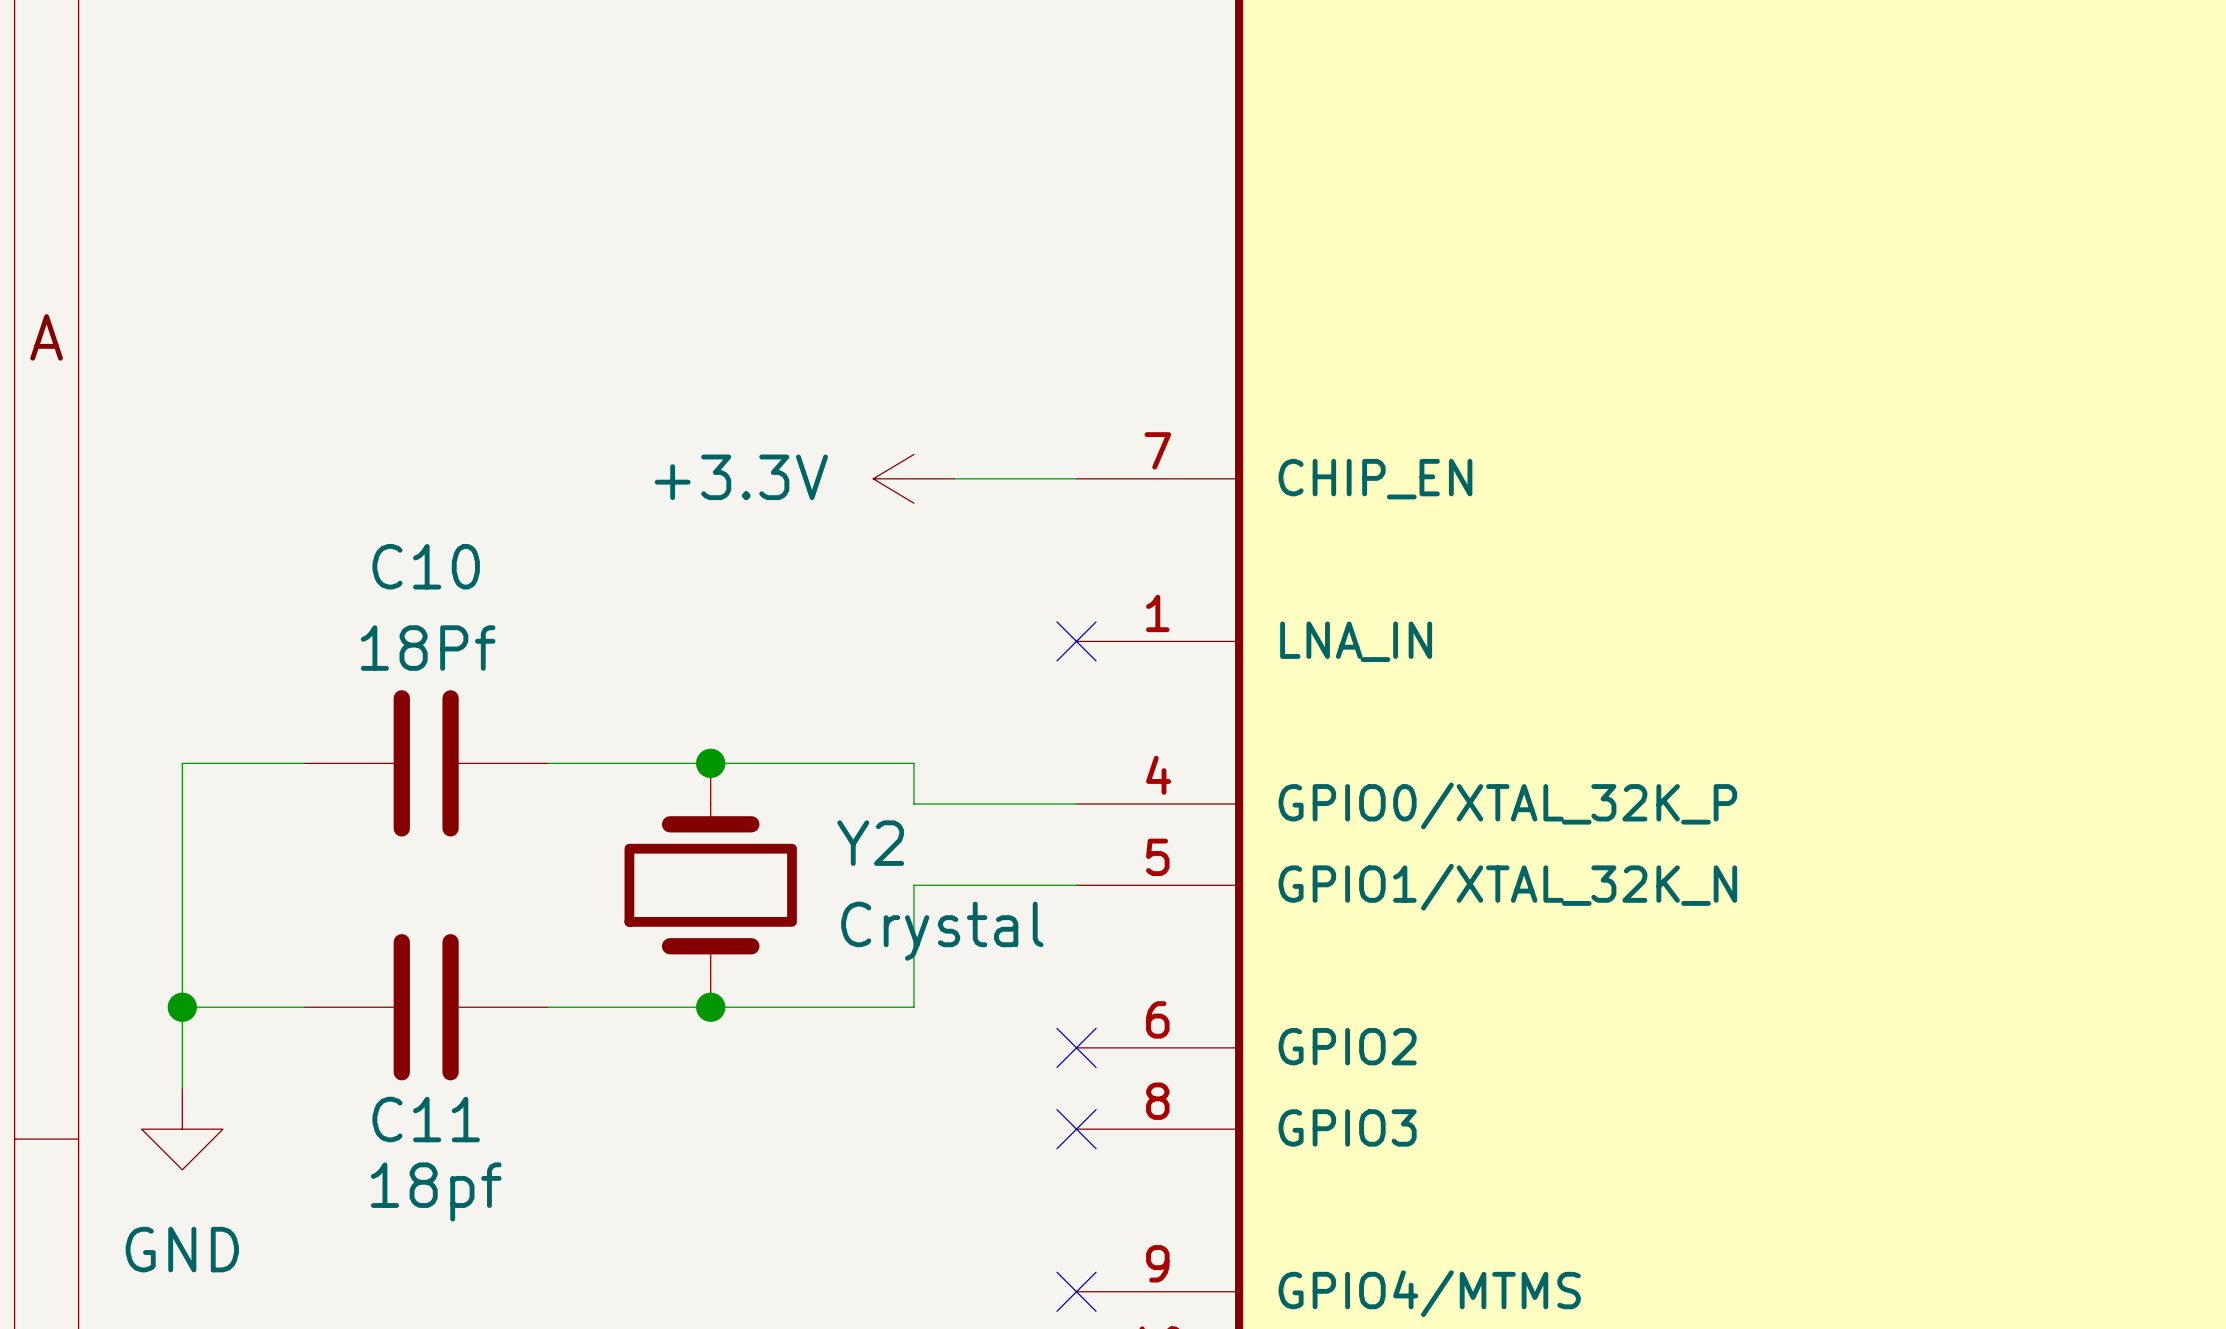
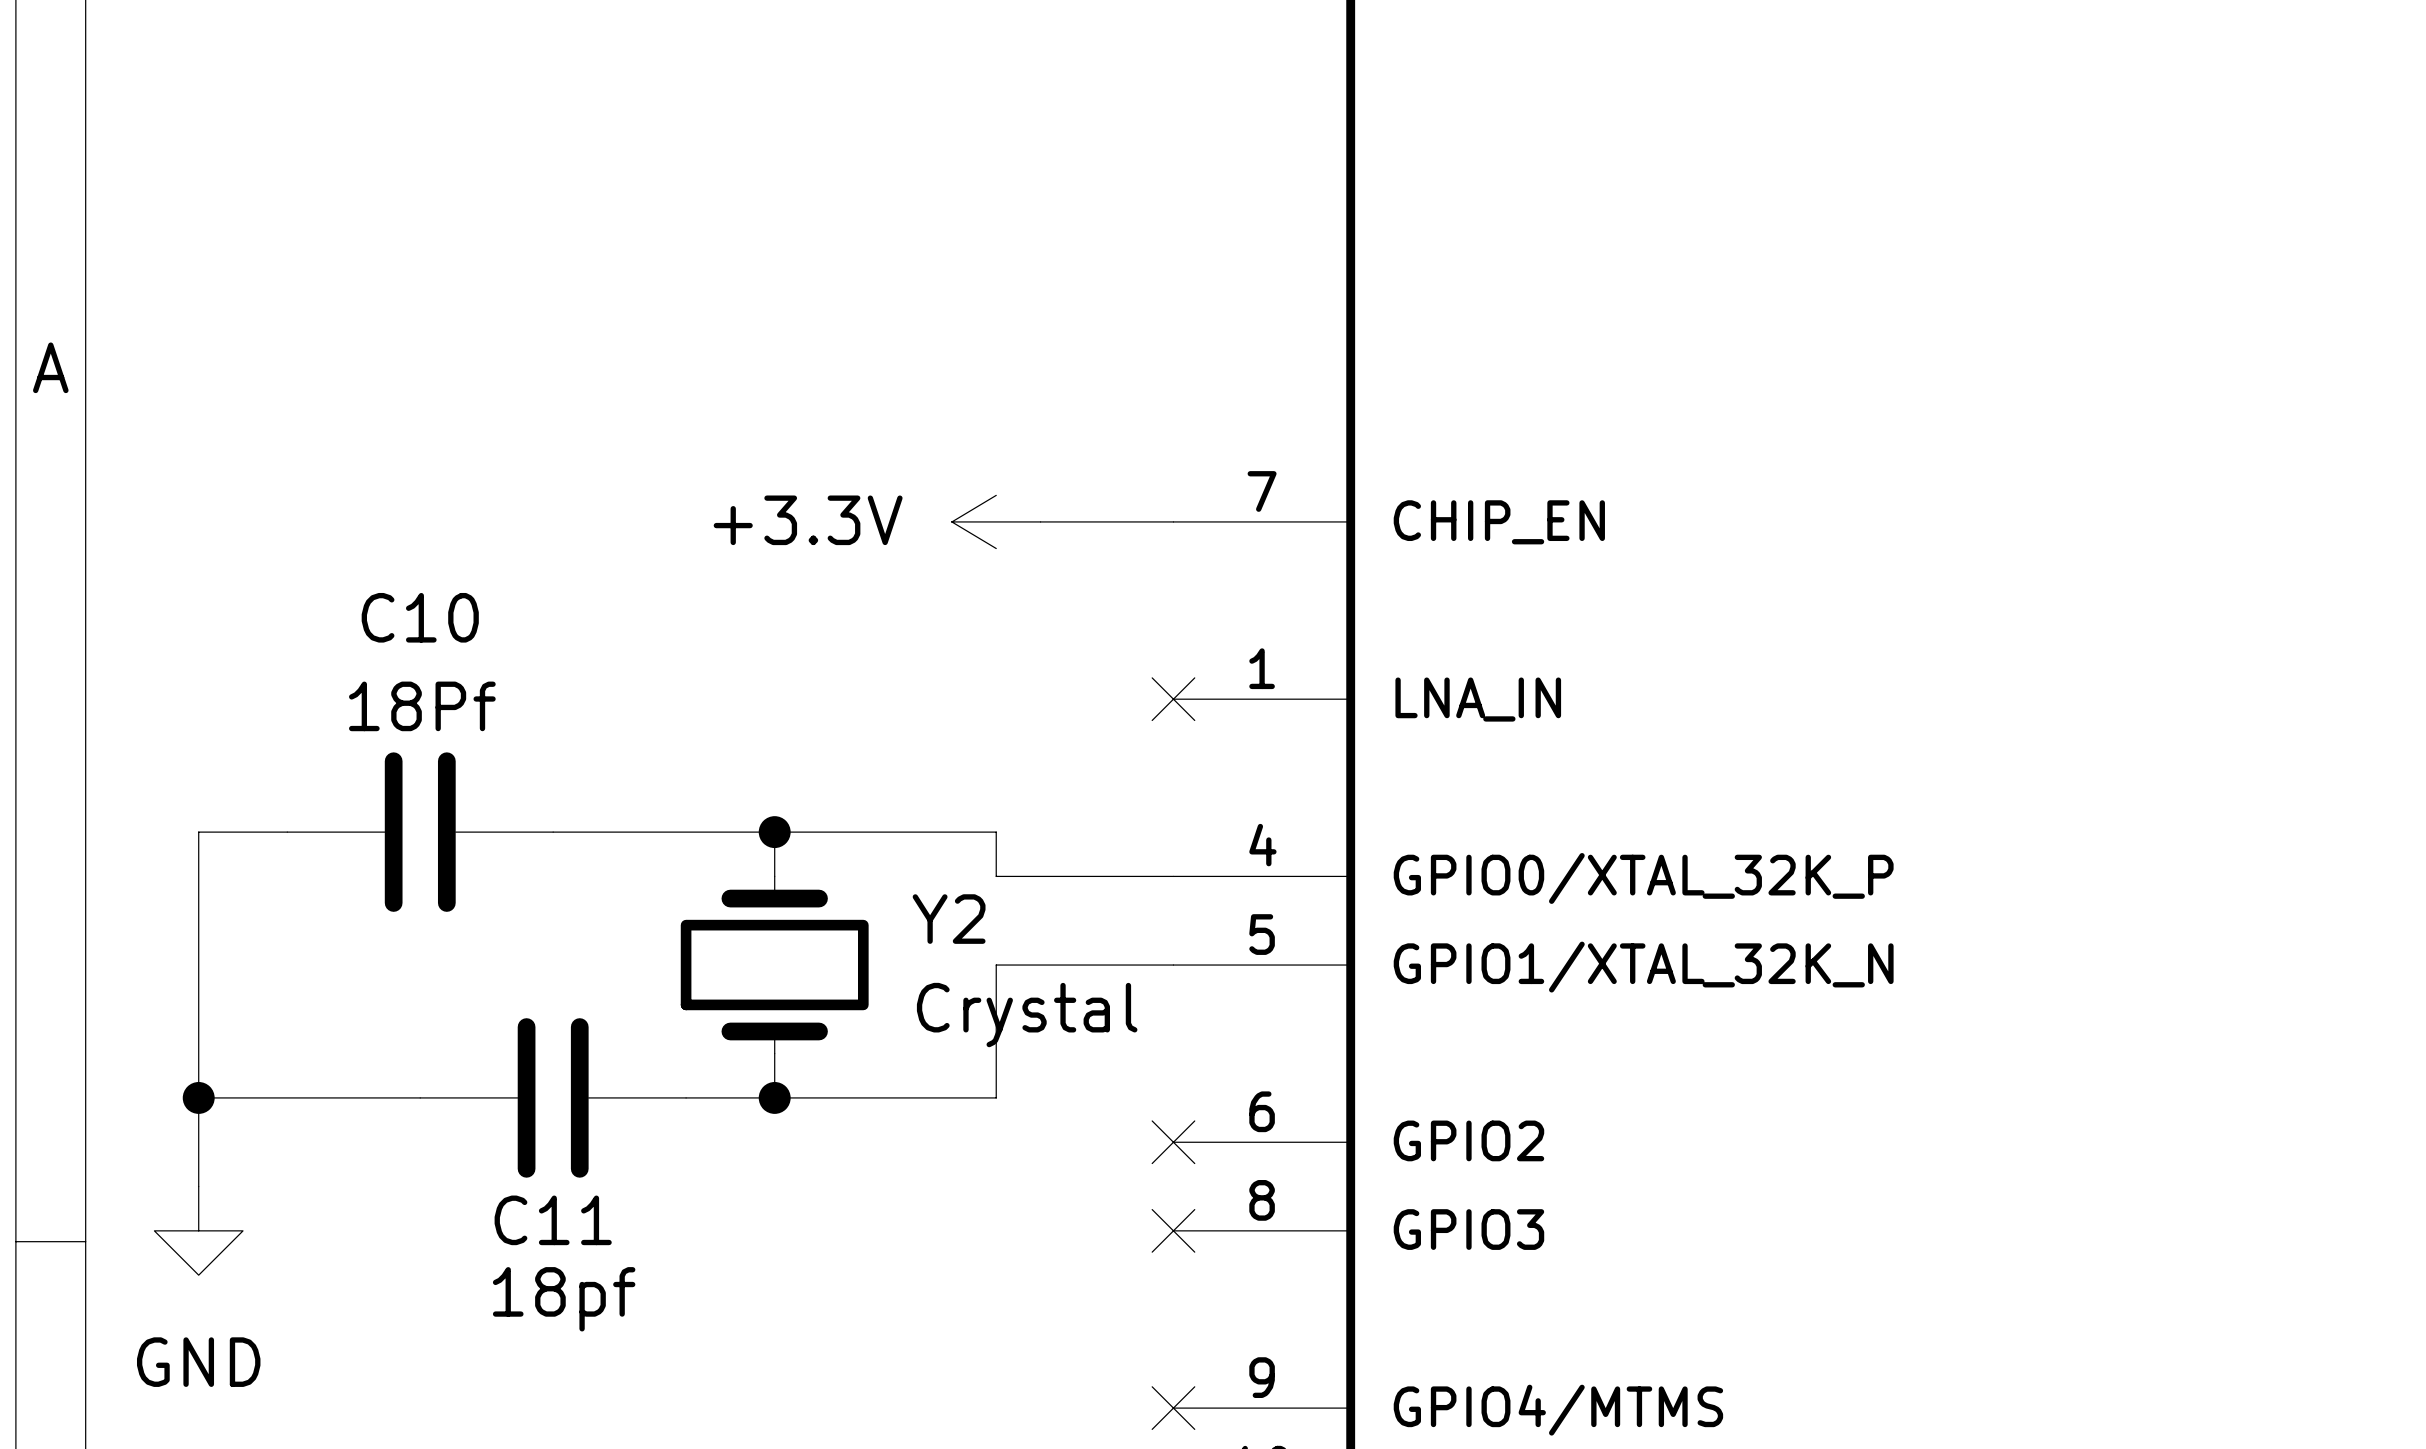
C10 position: (426, 763) -> (420, 832)
C11 position: (426, 1007) -> (553, 1097)

